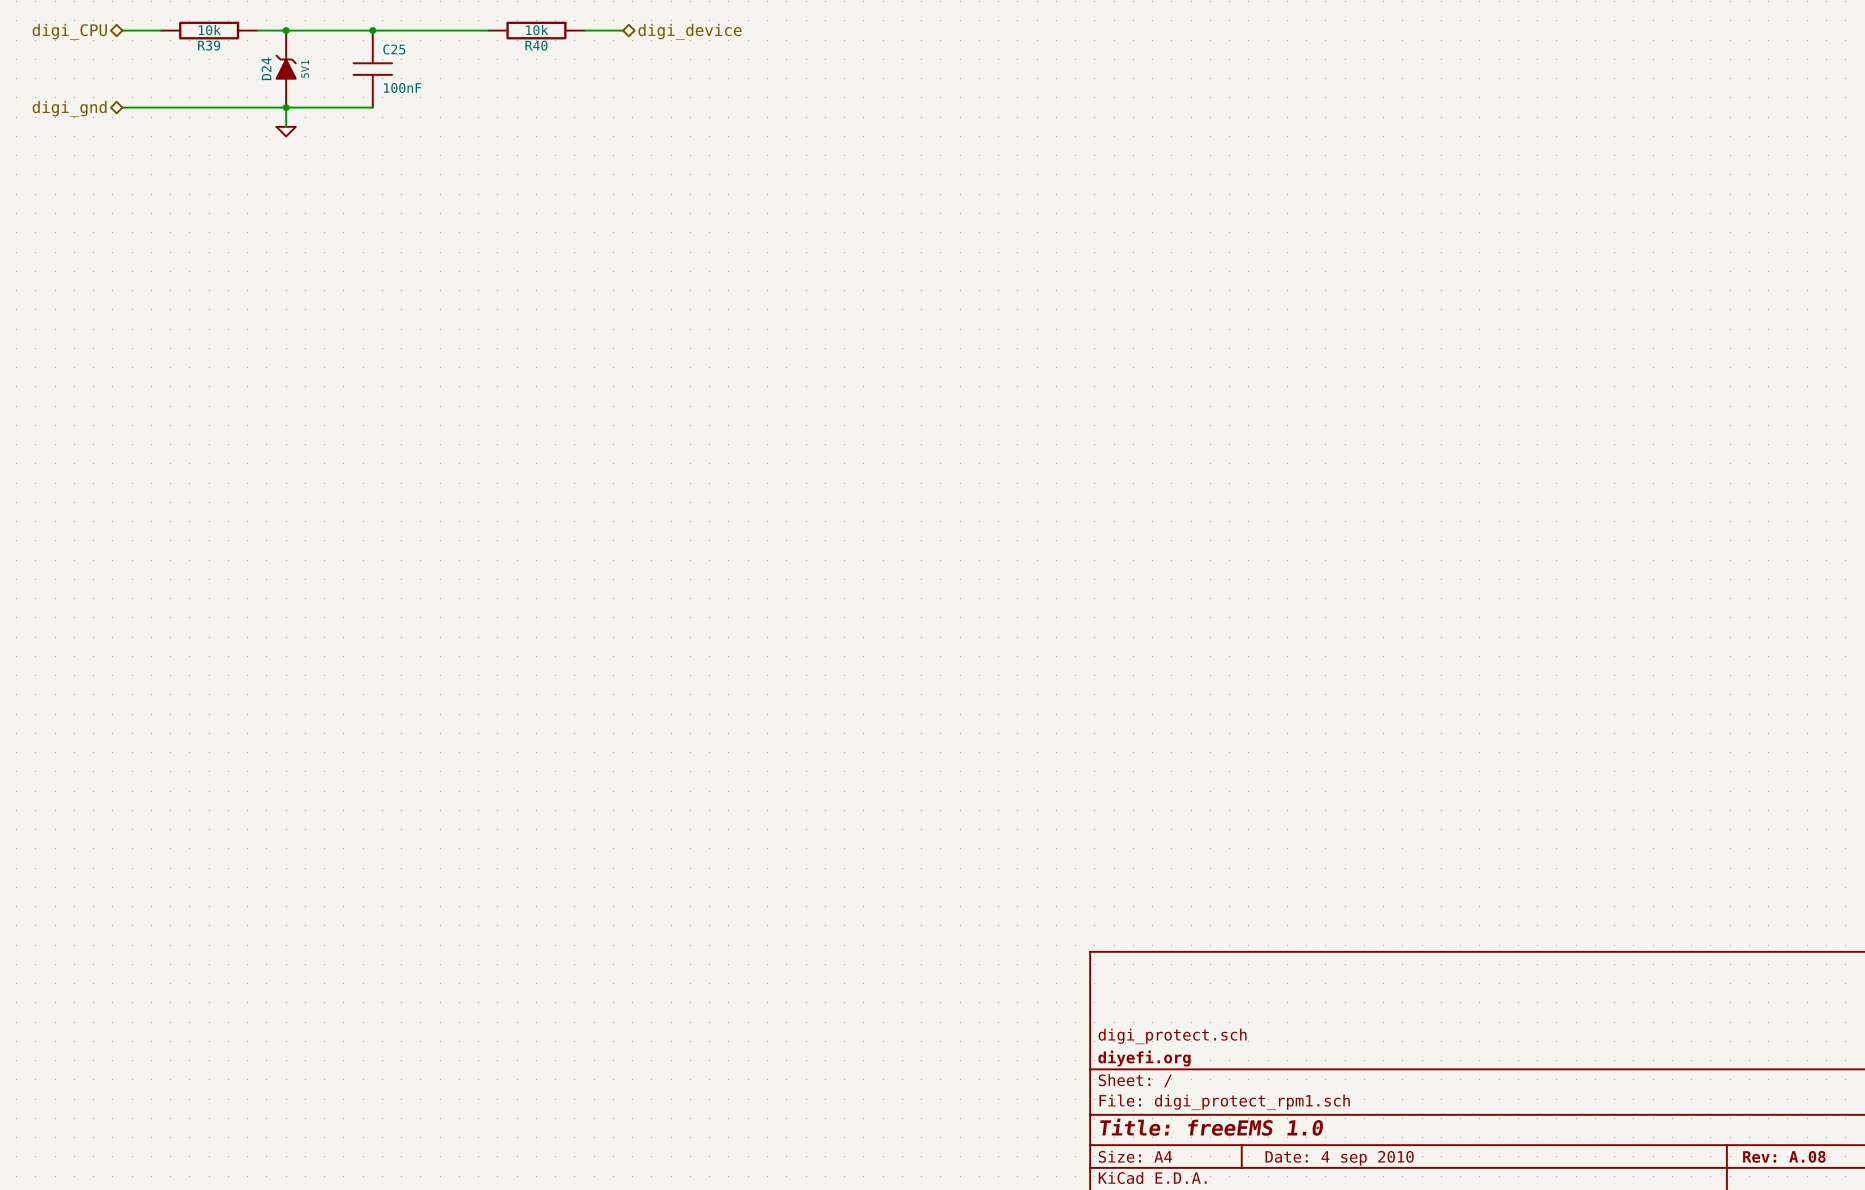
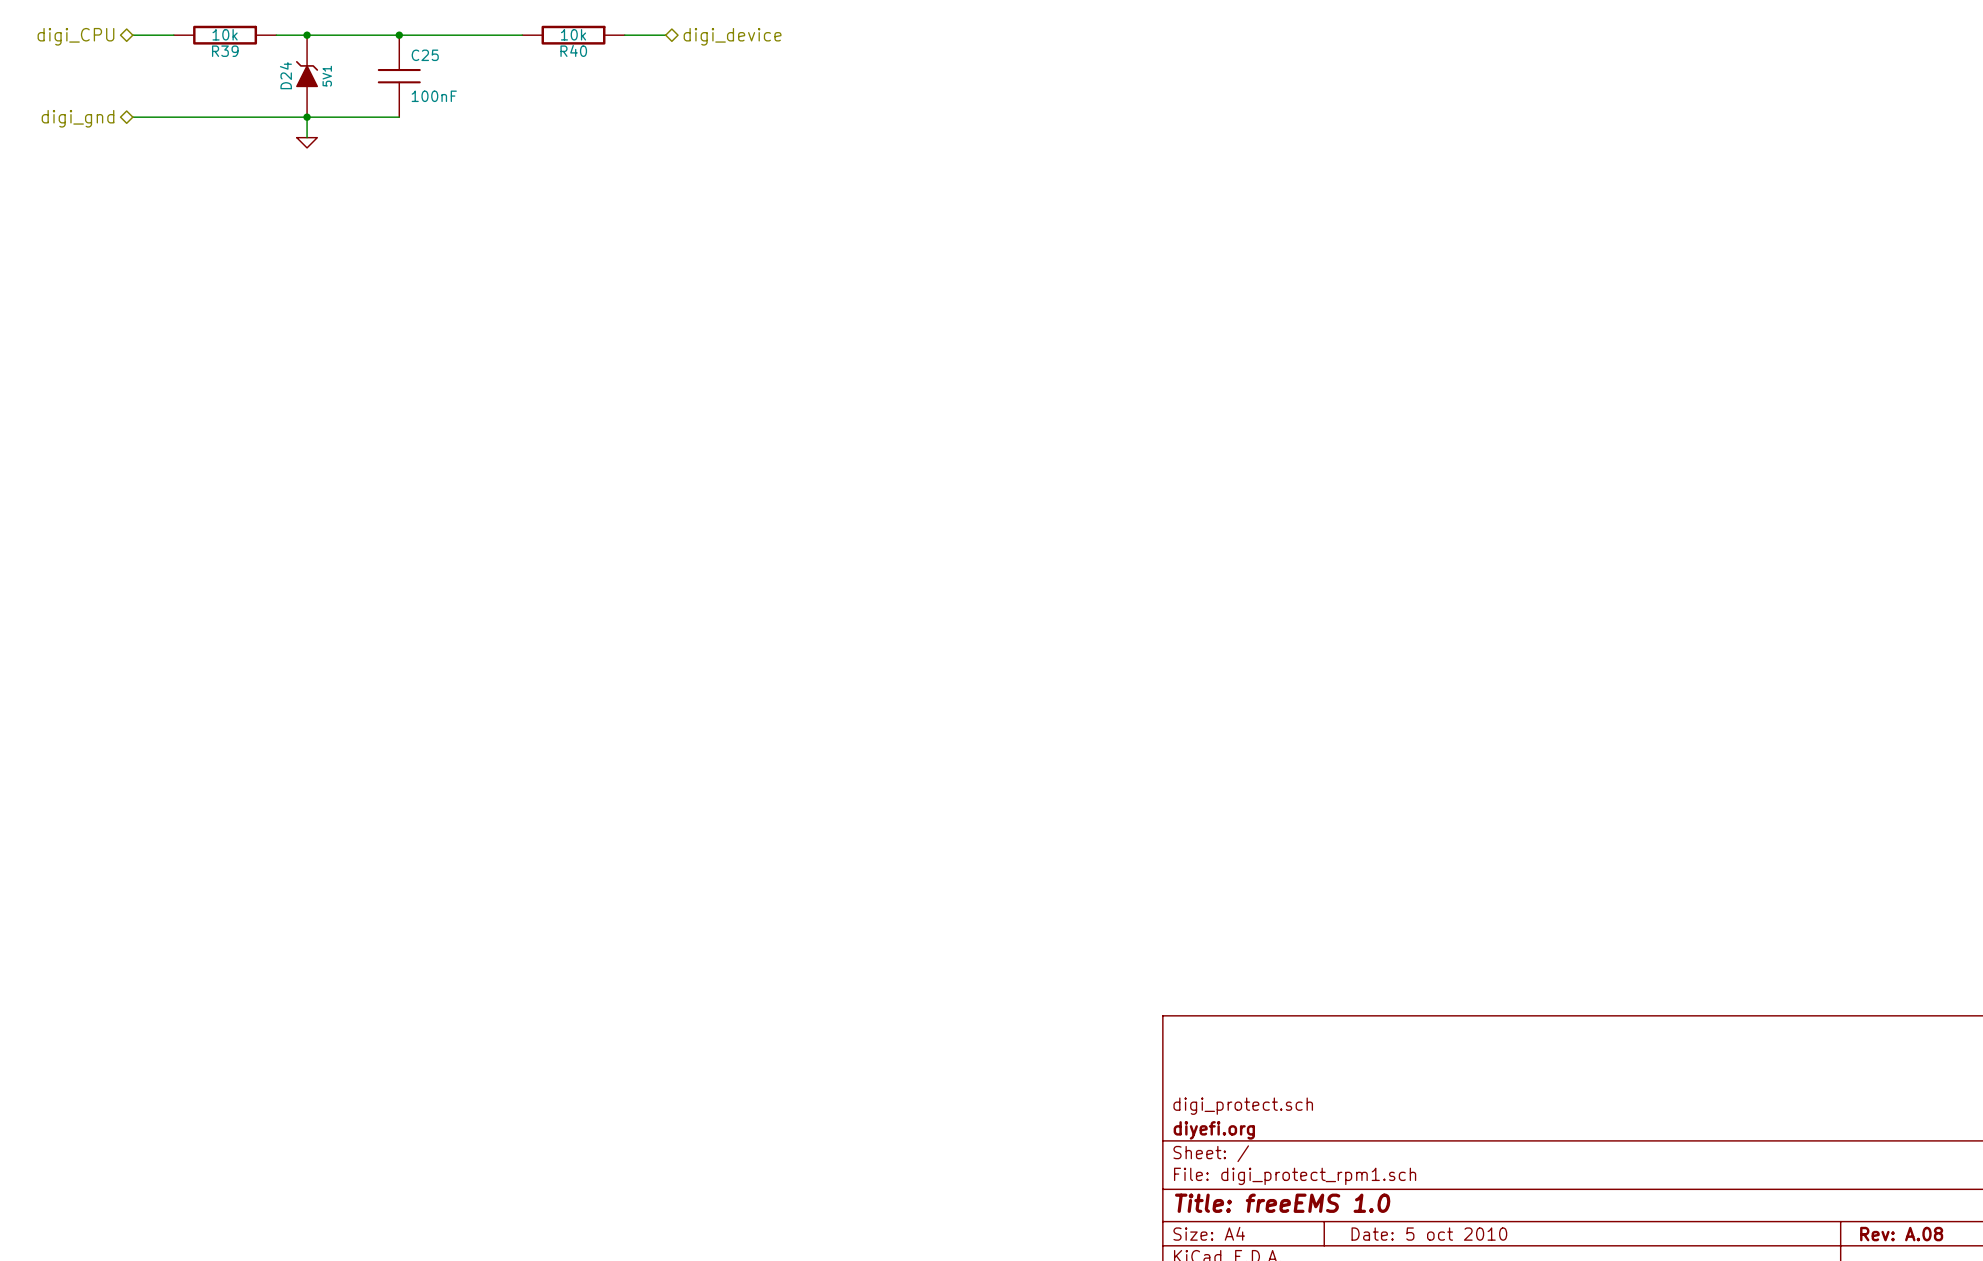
title block: Date: 4 sep 2010 (1339, 1158) -> Date: 5 oct 2010 (1429, 1234)

